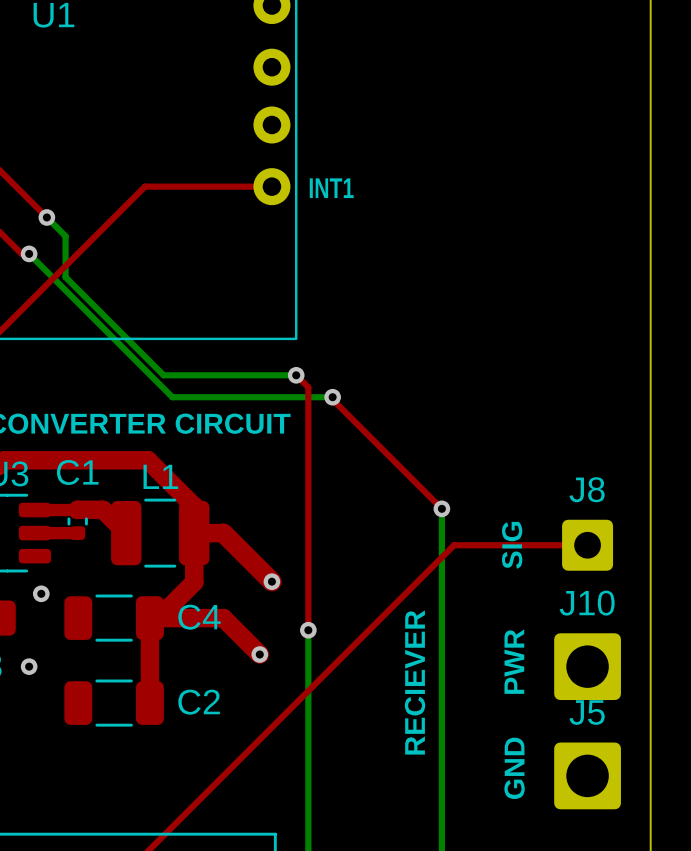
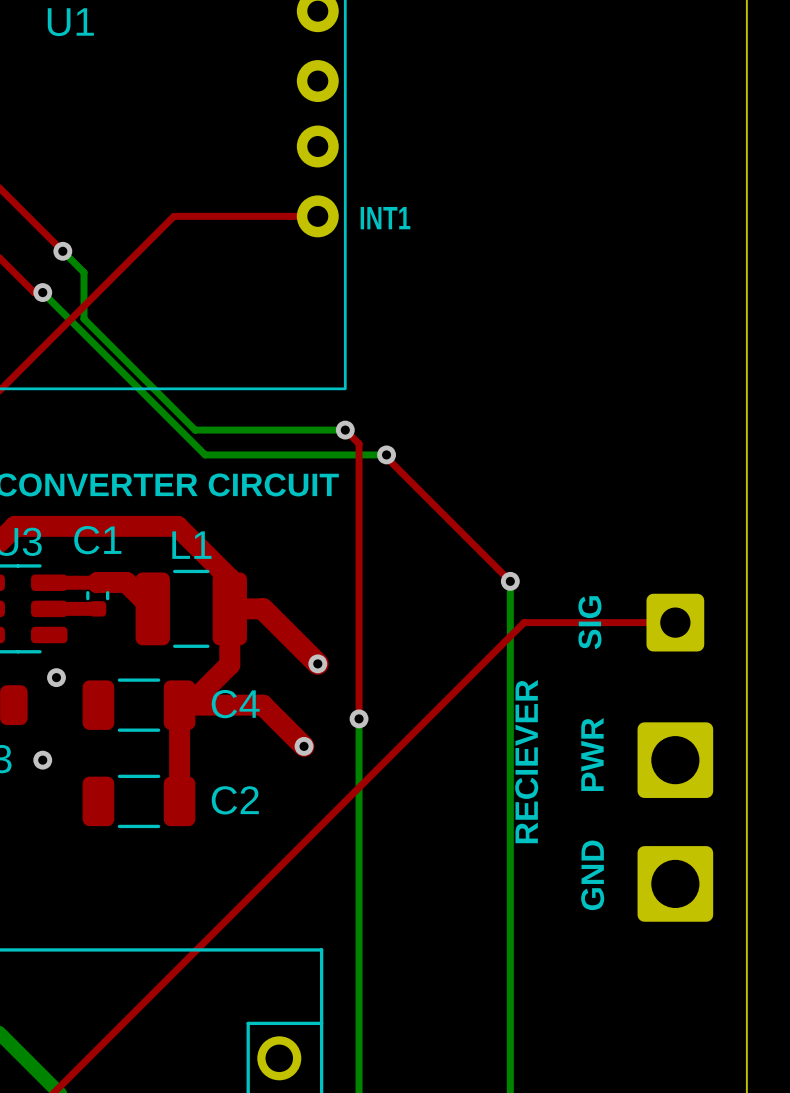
J8 name: J8 (587, 489) -> none
J10 name: J10 (587, 603) -> none
text position: RECIEVER (415, 682) -> RECIEVER (526, 761)
J5 name: J5 (587, 712) -> none

